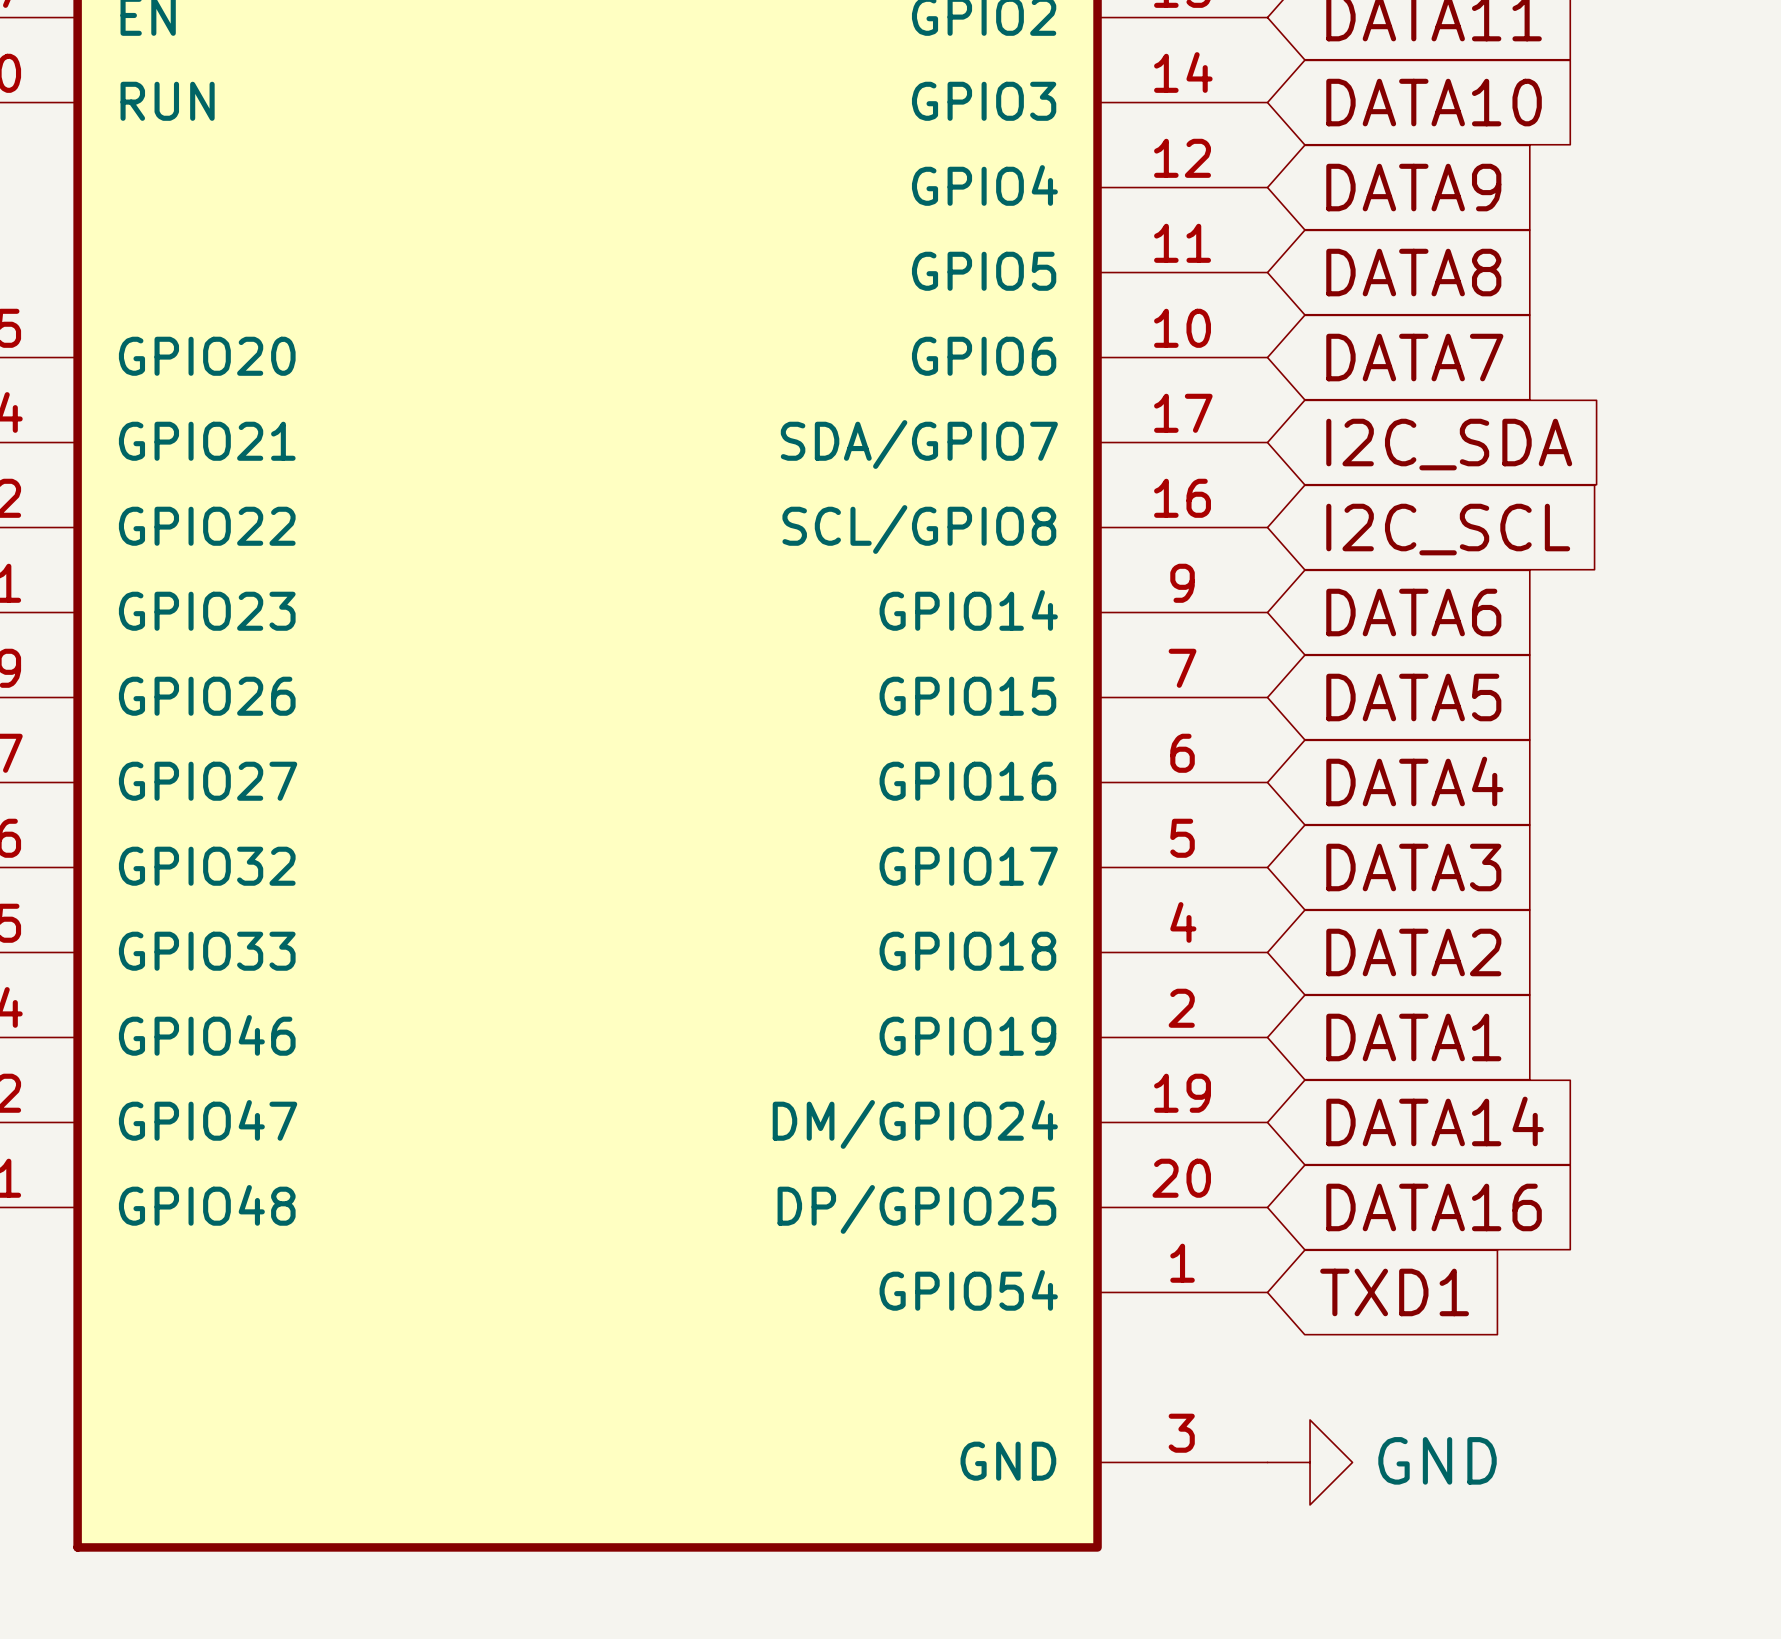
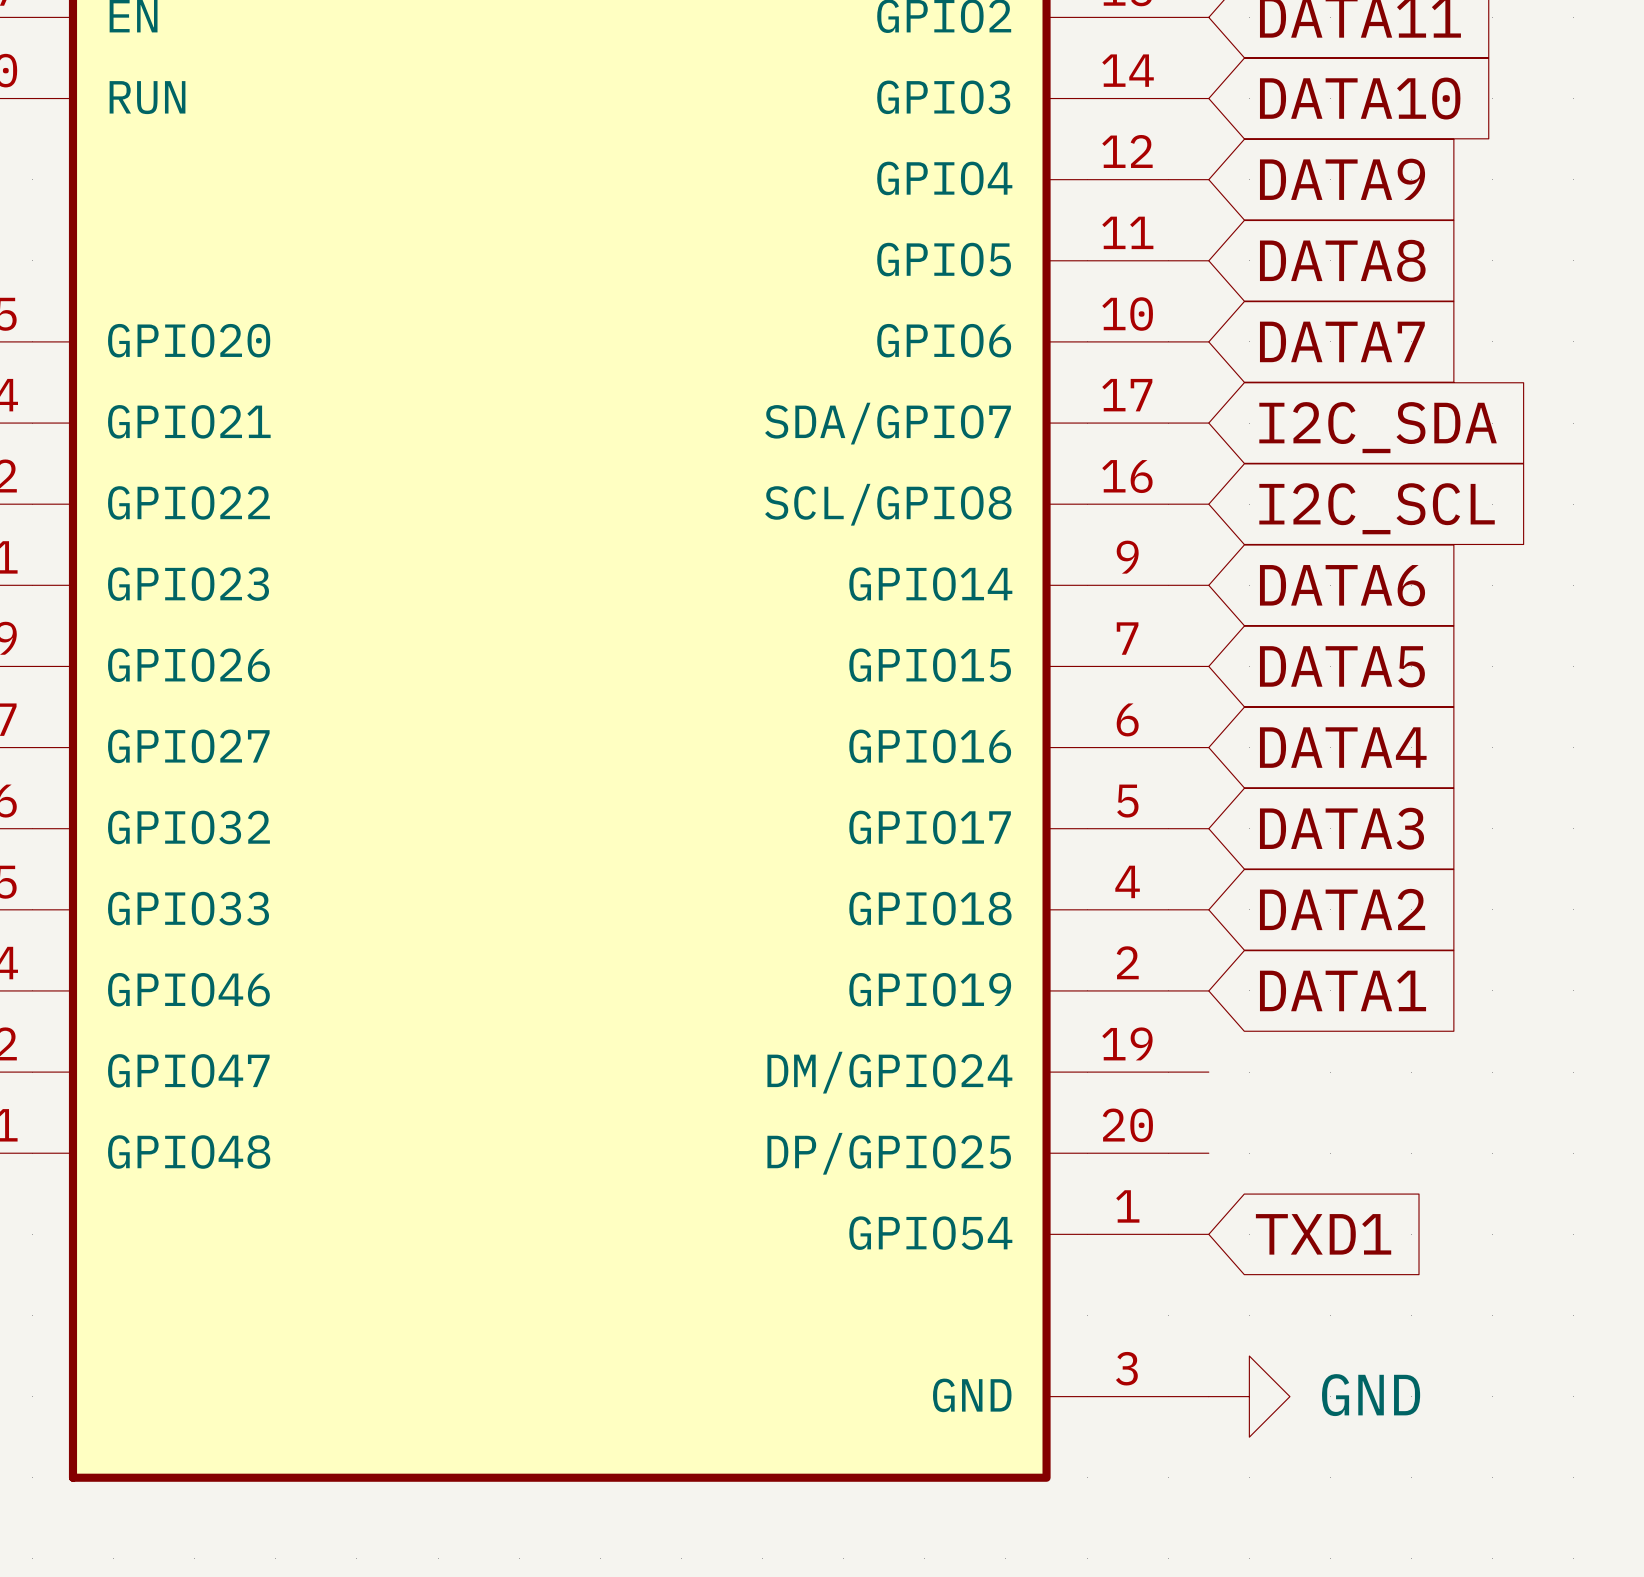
global label: DATA14 (1435, 1121) -> none
global label: DATA16 (1434, 1207) -> none

